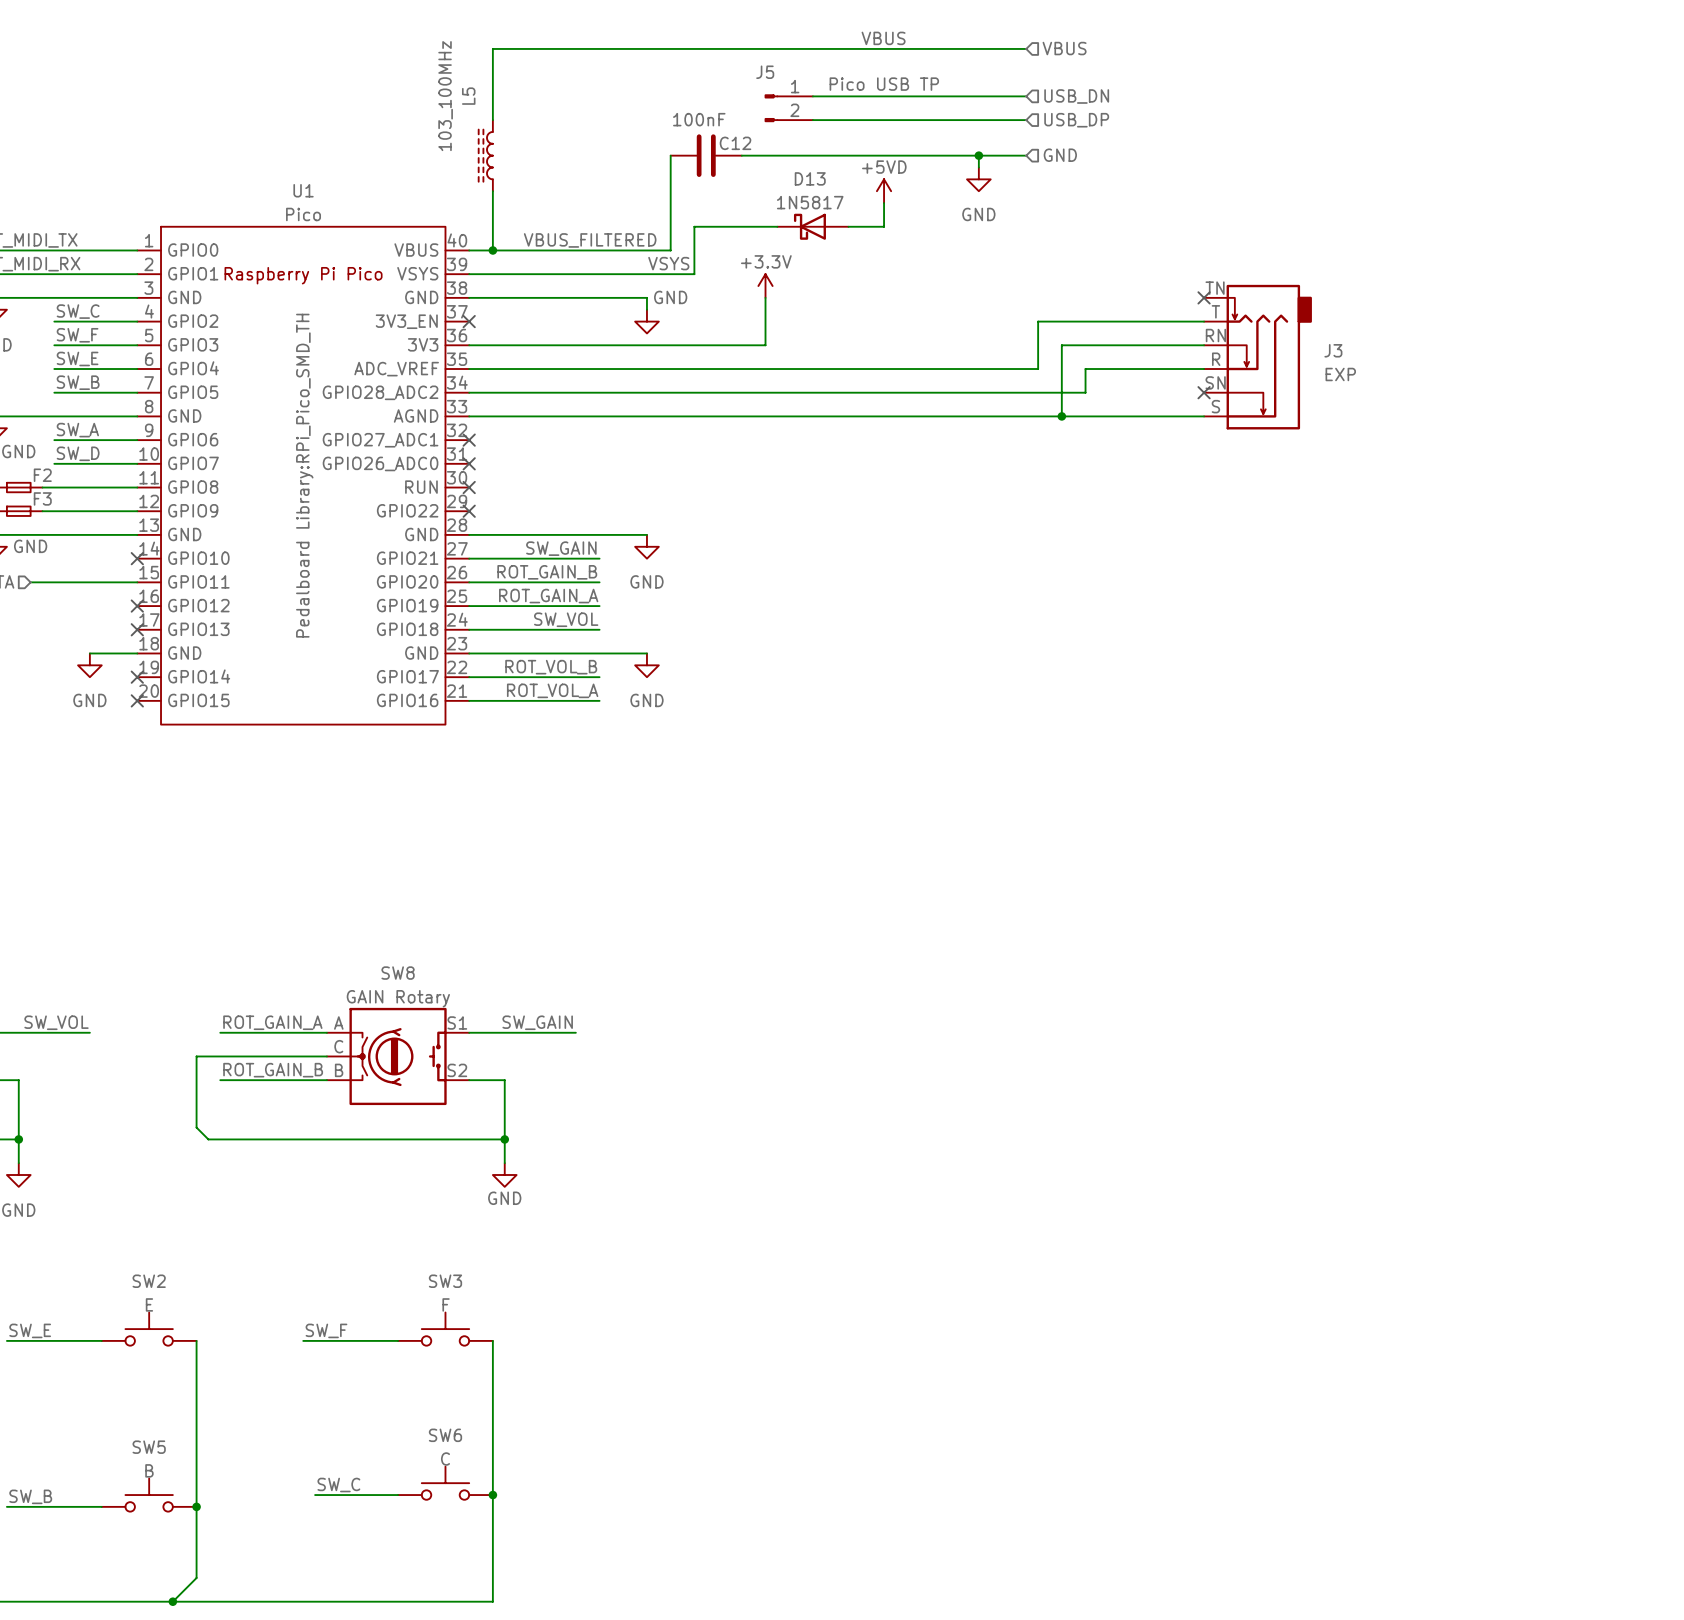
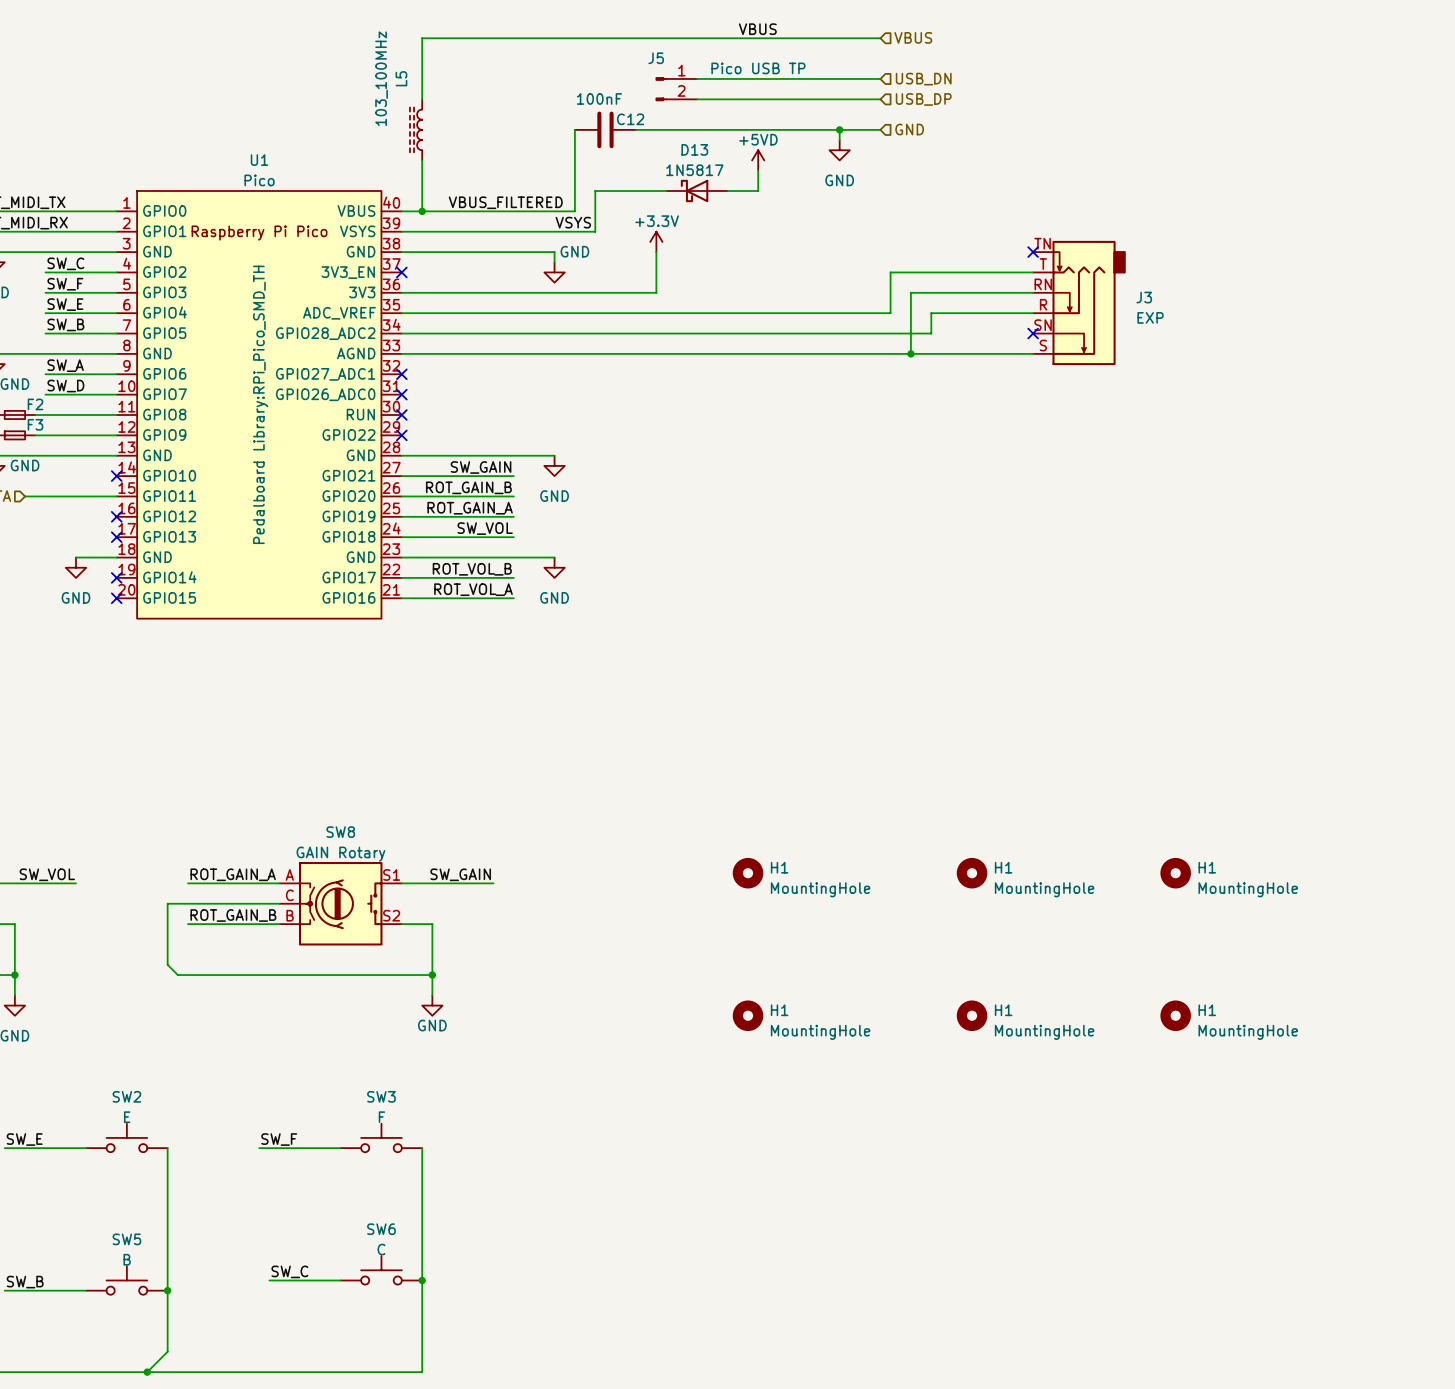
H1: none -> MountingHole (748, 873)
H1: none -> MountingHole (972, 873)
H1: none -> MountingHole (1175, 873)
H1: none -> MountingHole (748, 1015)
H1: none -> MountingHole (972, 1015)
H1: none -> MountingHole (1175, 1015)

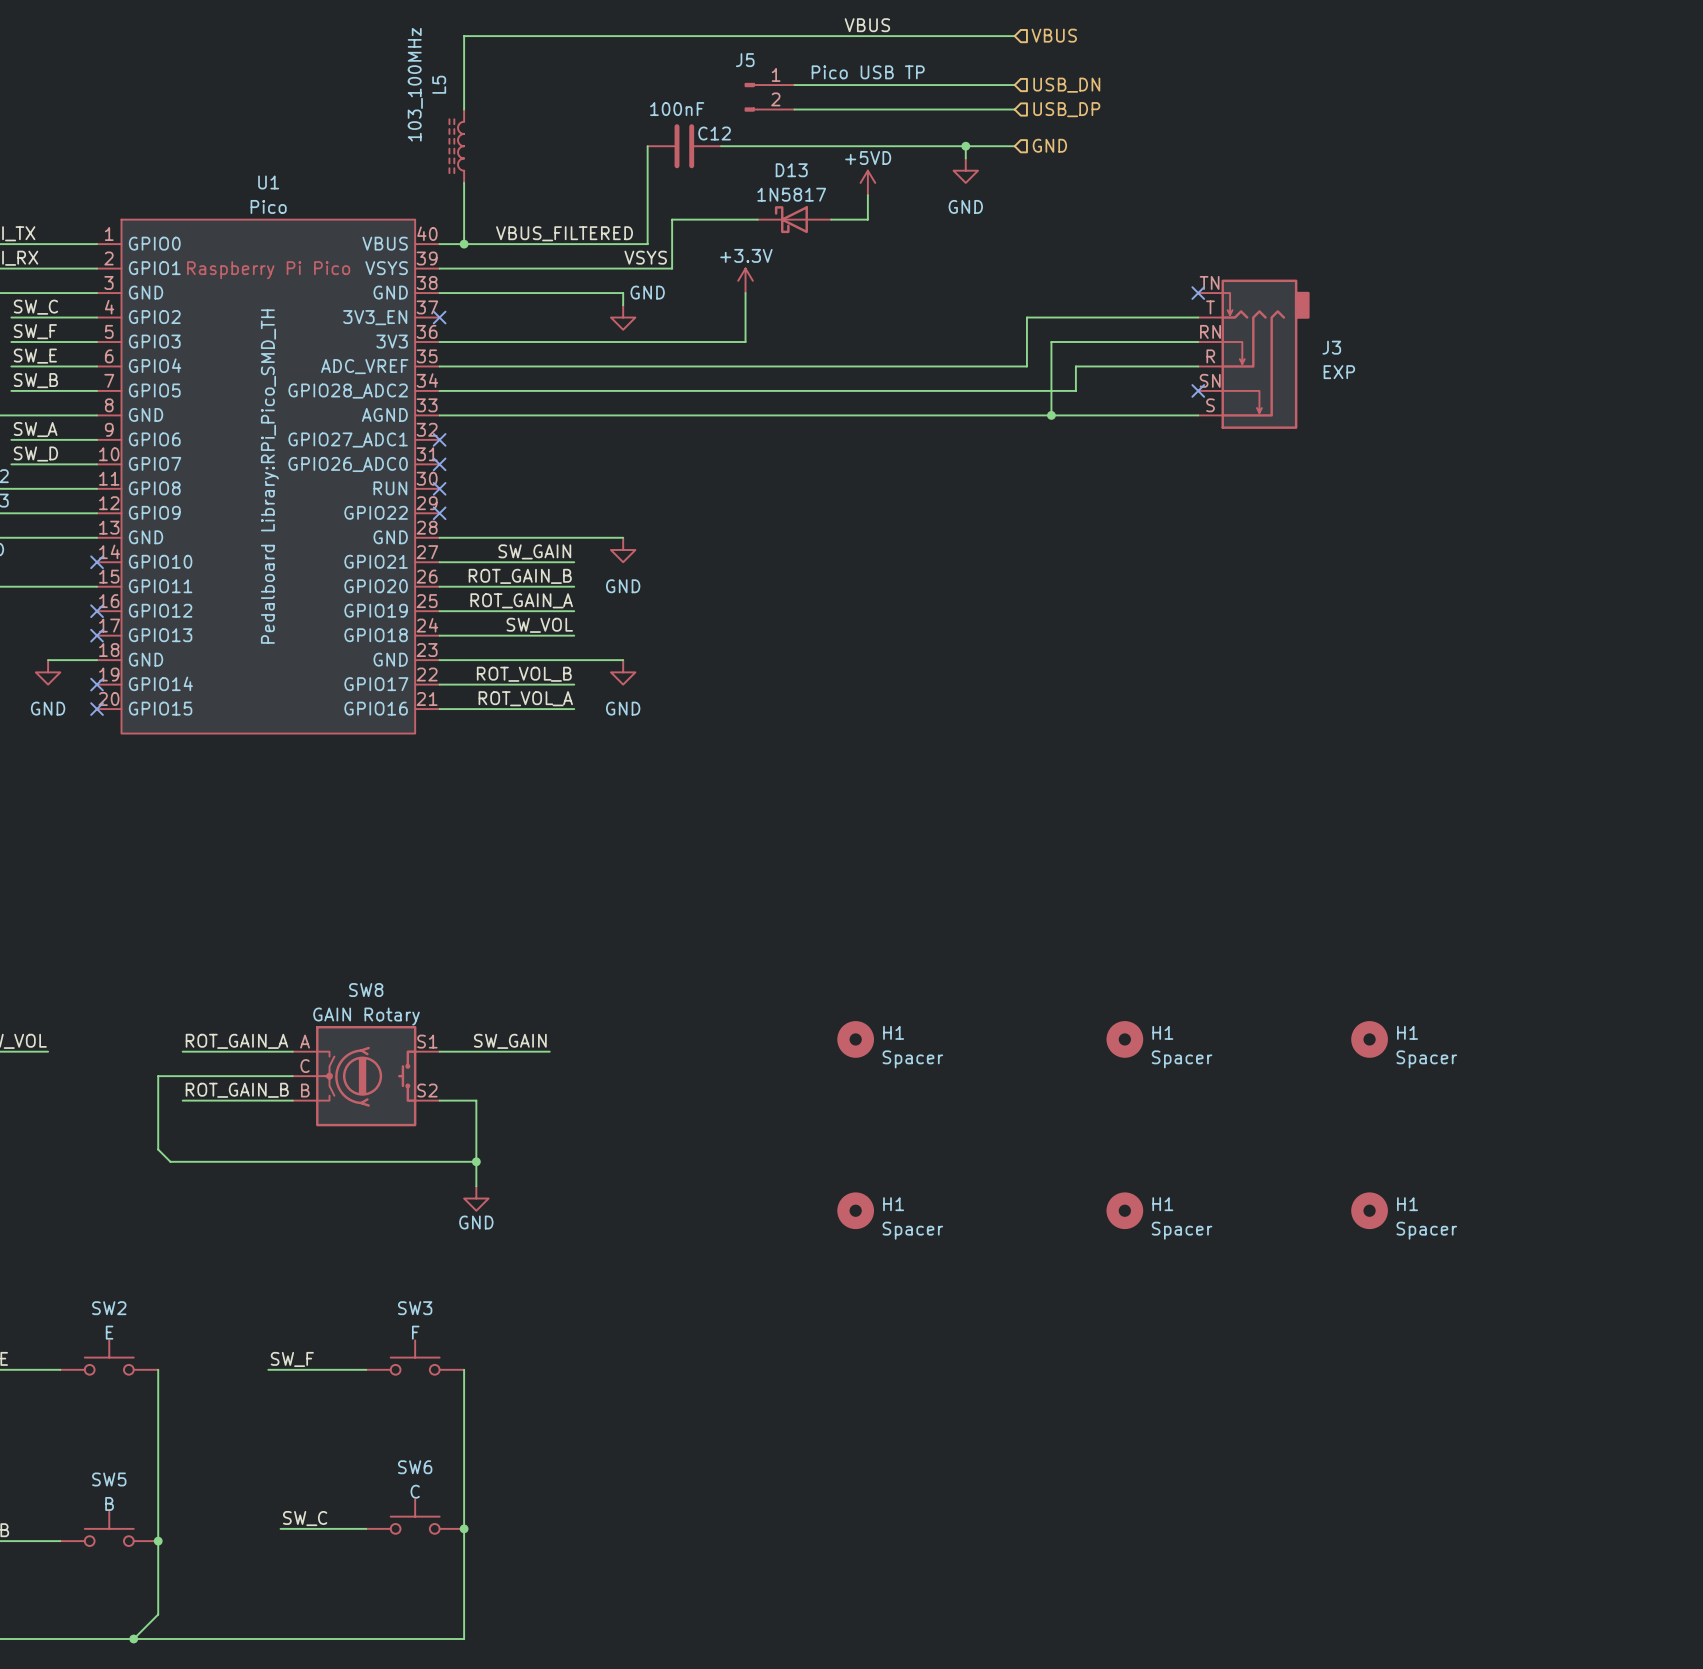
H1 value: MountingHole (820, 889) -> Spacer (912, 1059)
H1 value: MountingHole (1044, 889) -> Spacer (1182, 1059)
H1 value: MountingHole (1248, 889) -> Spacer (1426, 1059)
H1 value: MountingHole (820, 1032) -> Spacer (912, 1230)
H1 value: MountingHole (1044, 1032) -> Spacer (1182, 1230)
H1 value: MountingHole (1248, 1032) -> Spacer (1426, 1230)

